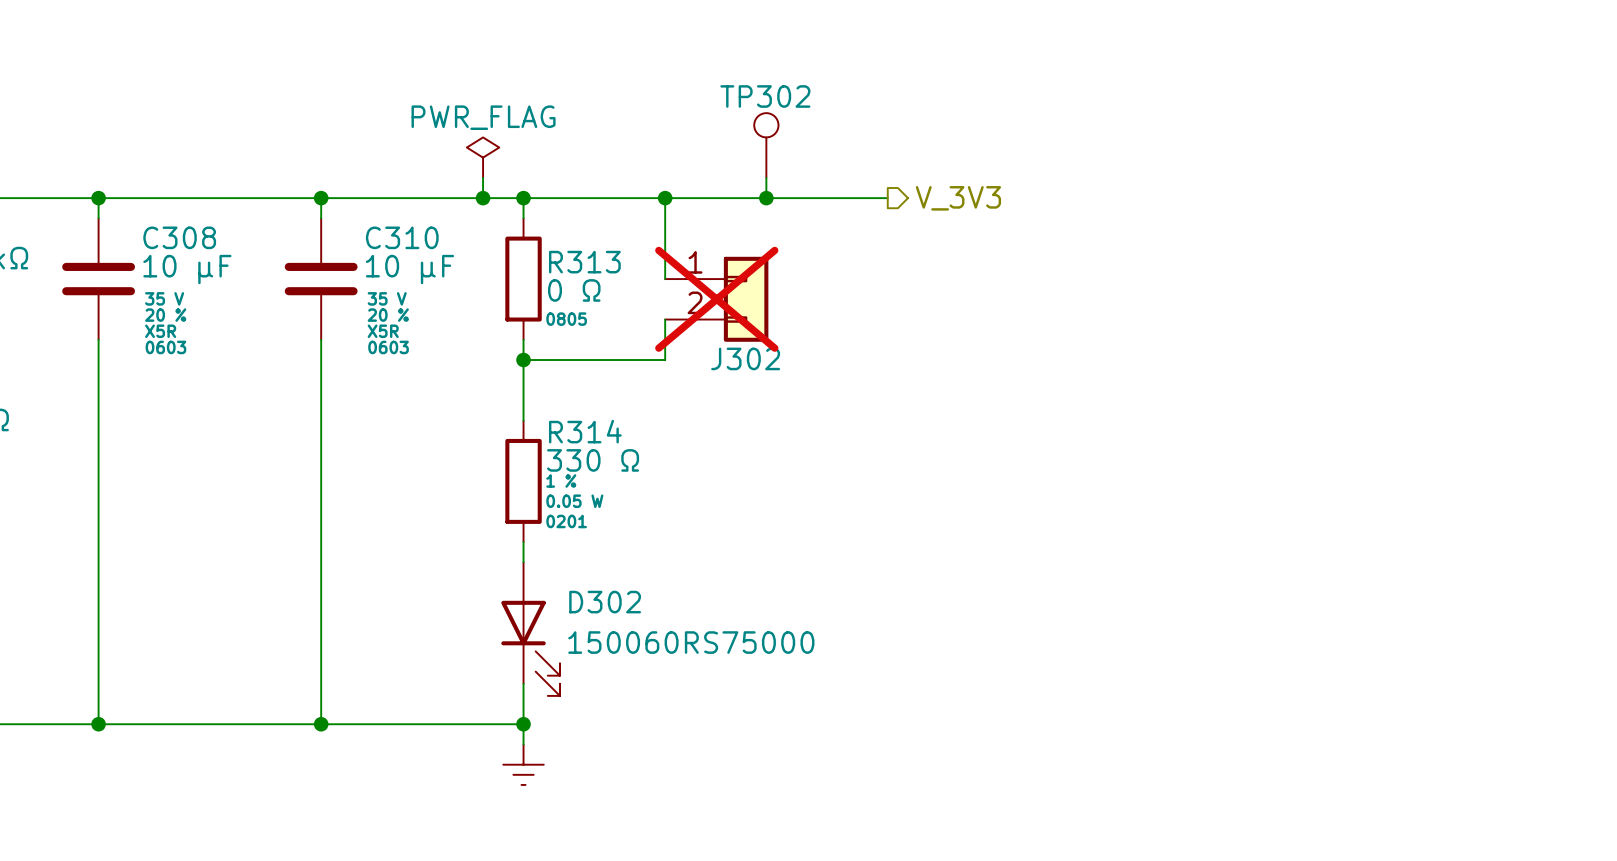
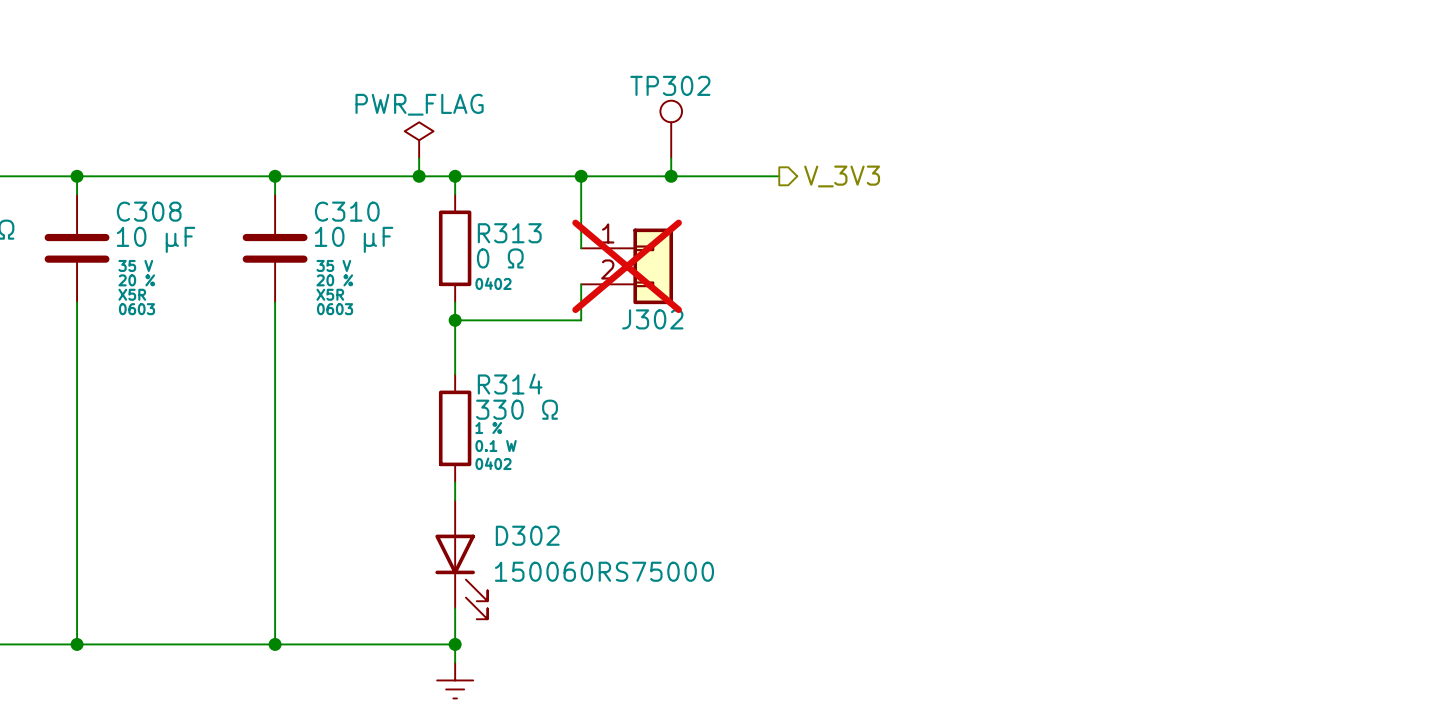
R313 text: 0805 (566, 319) -> 0402 (493, 283)
R314 text: 0.05 W (574, 501) -> 0.1 W (496, 446)
R314 text: 0201 (566, 521) -> 0402 (493, 463)

